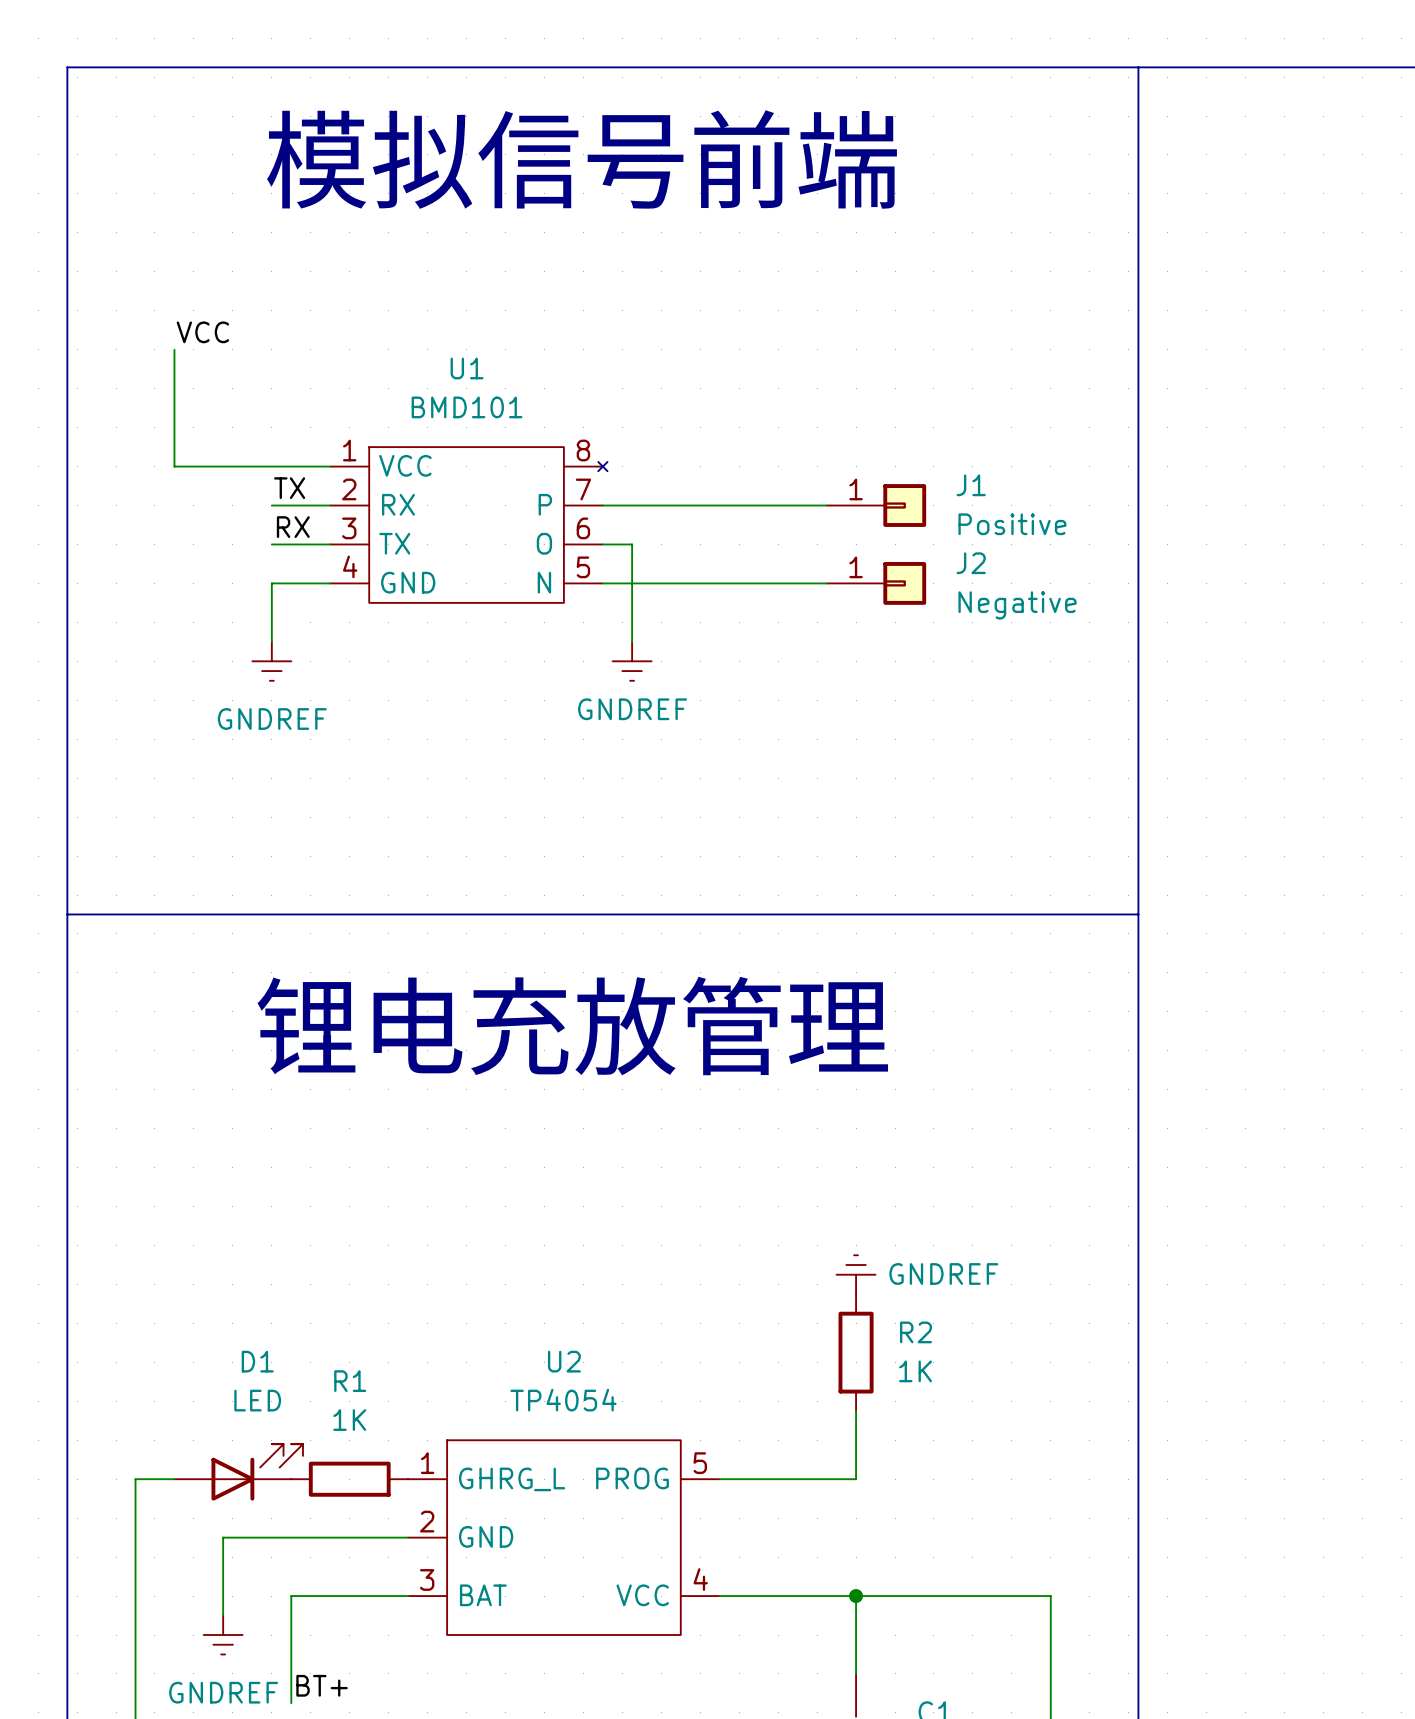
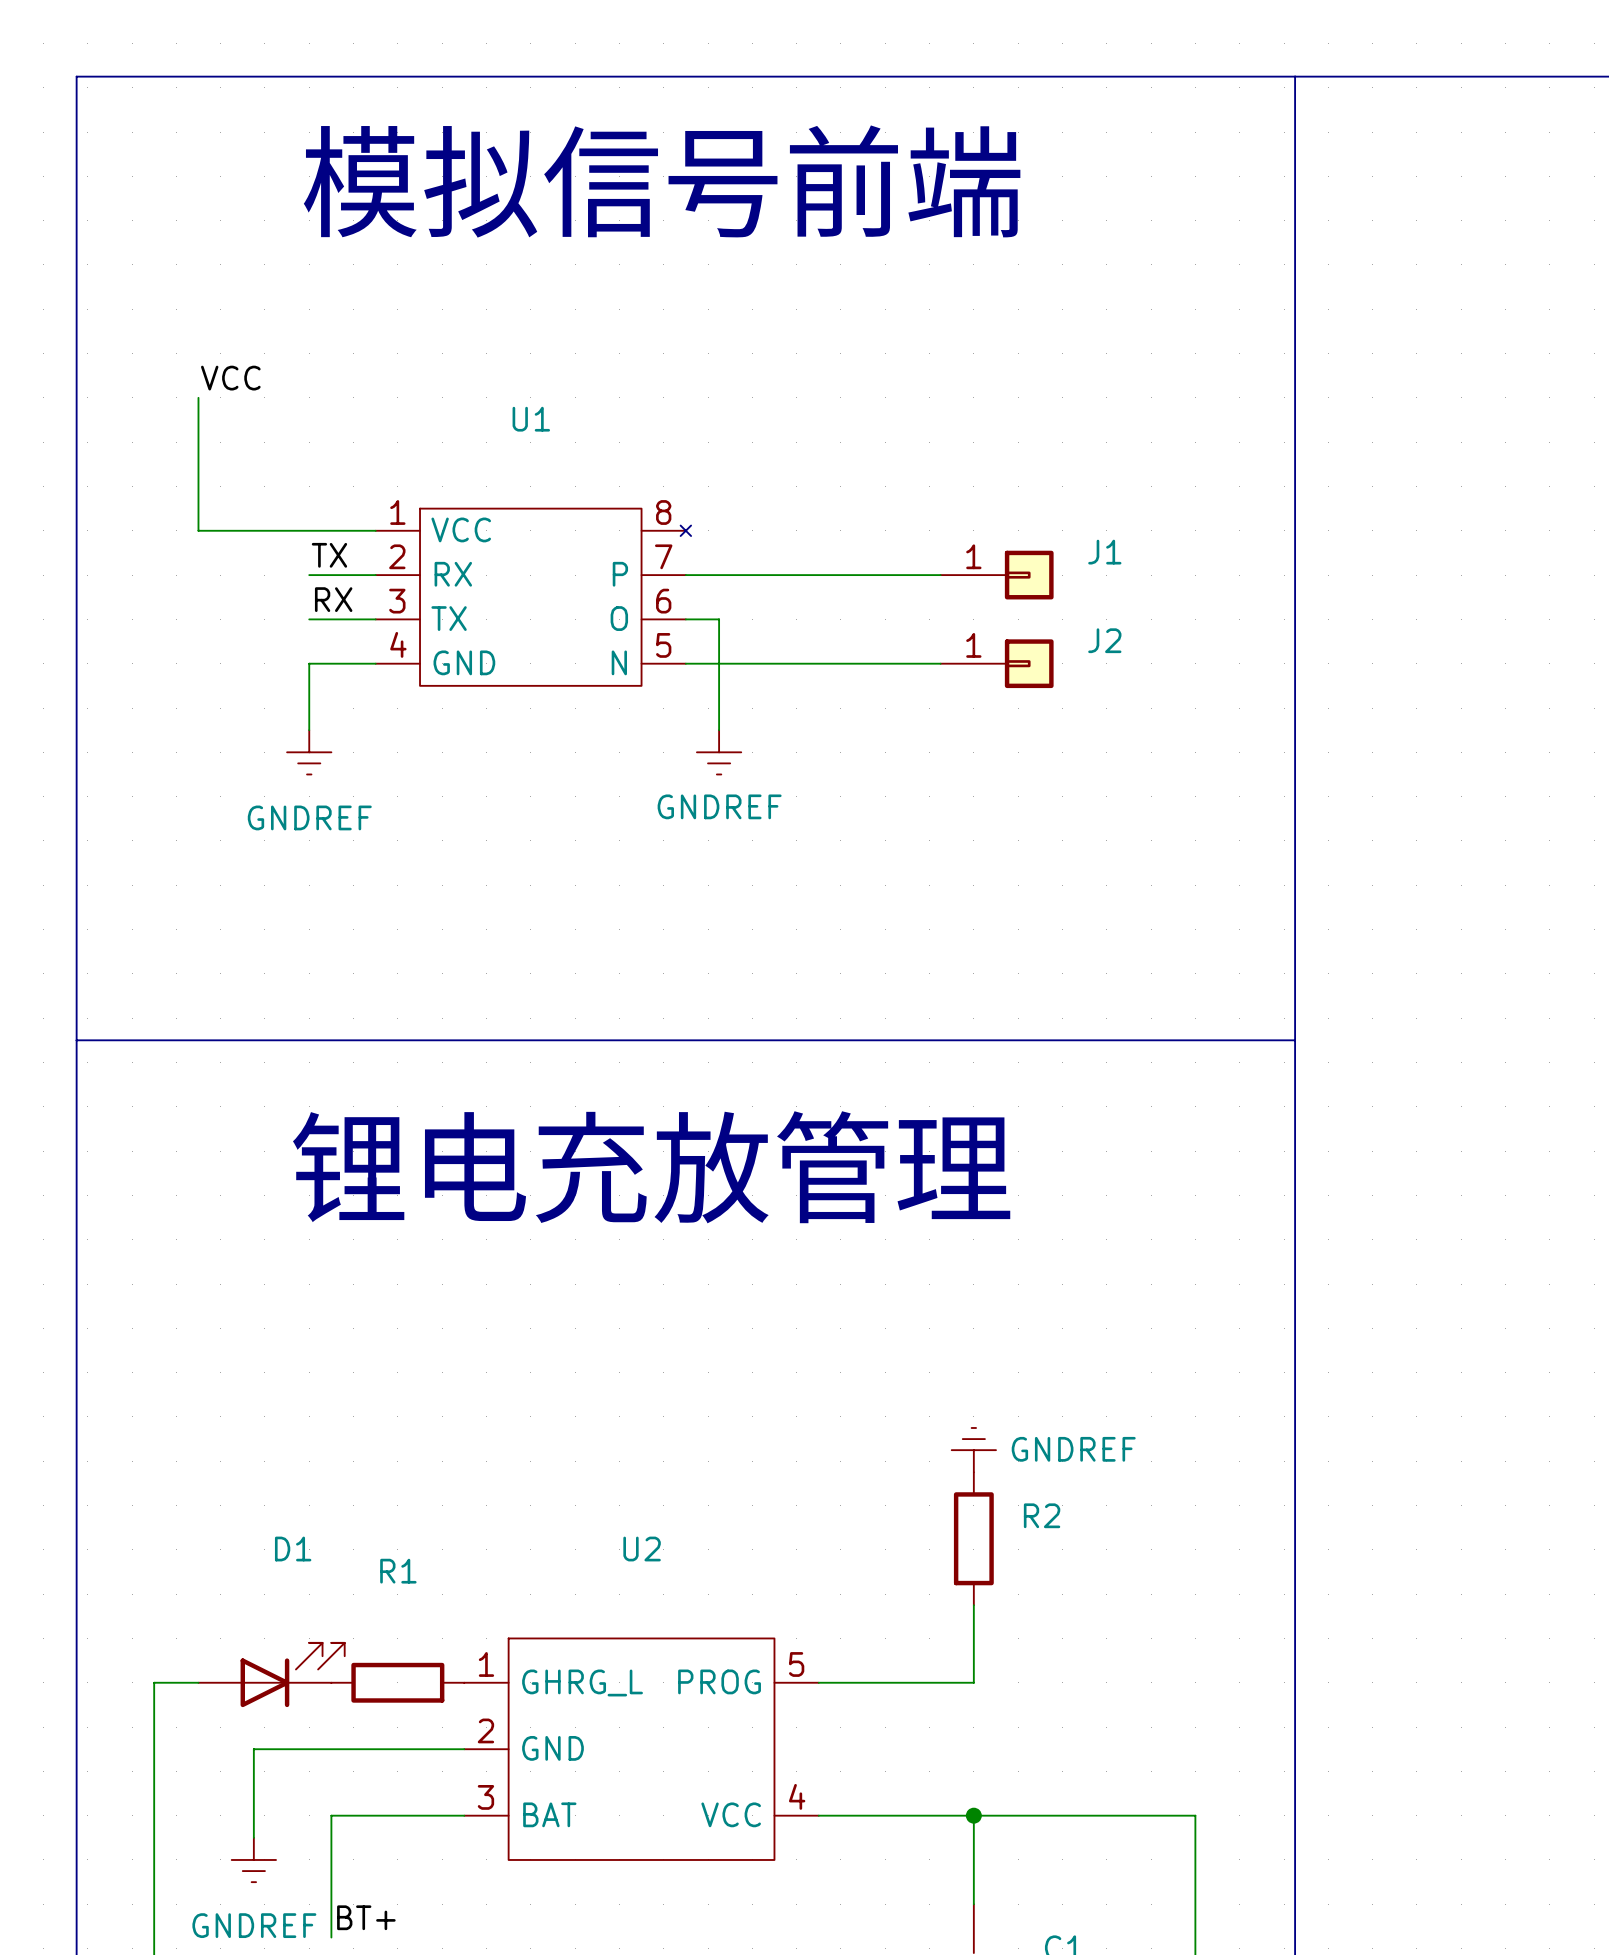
U1 value: BMD101 (467, 407) -> none
J1 value: Positive (1012, 524) -> none
J2 value: Negative (1017, 605) -> none
R2 value: 1K (915, 1371) -> none
D1 value: LED (257, 1400) -> none
U2 value: TP4054 (563, 1400) -> none
R1 value: 1K (349, 1420) -> none

